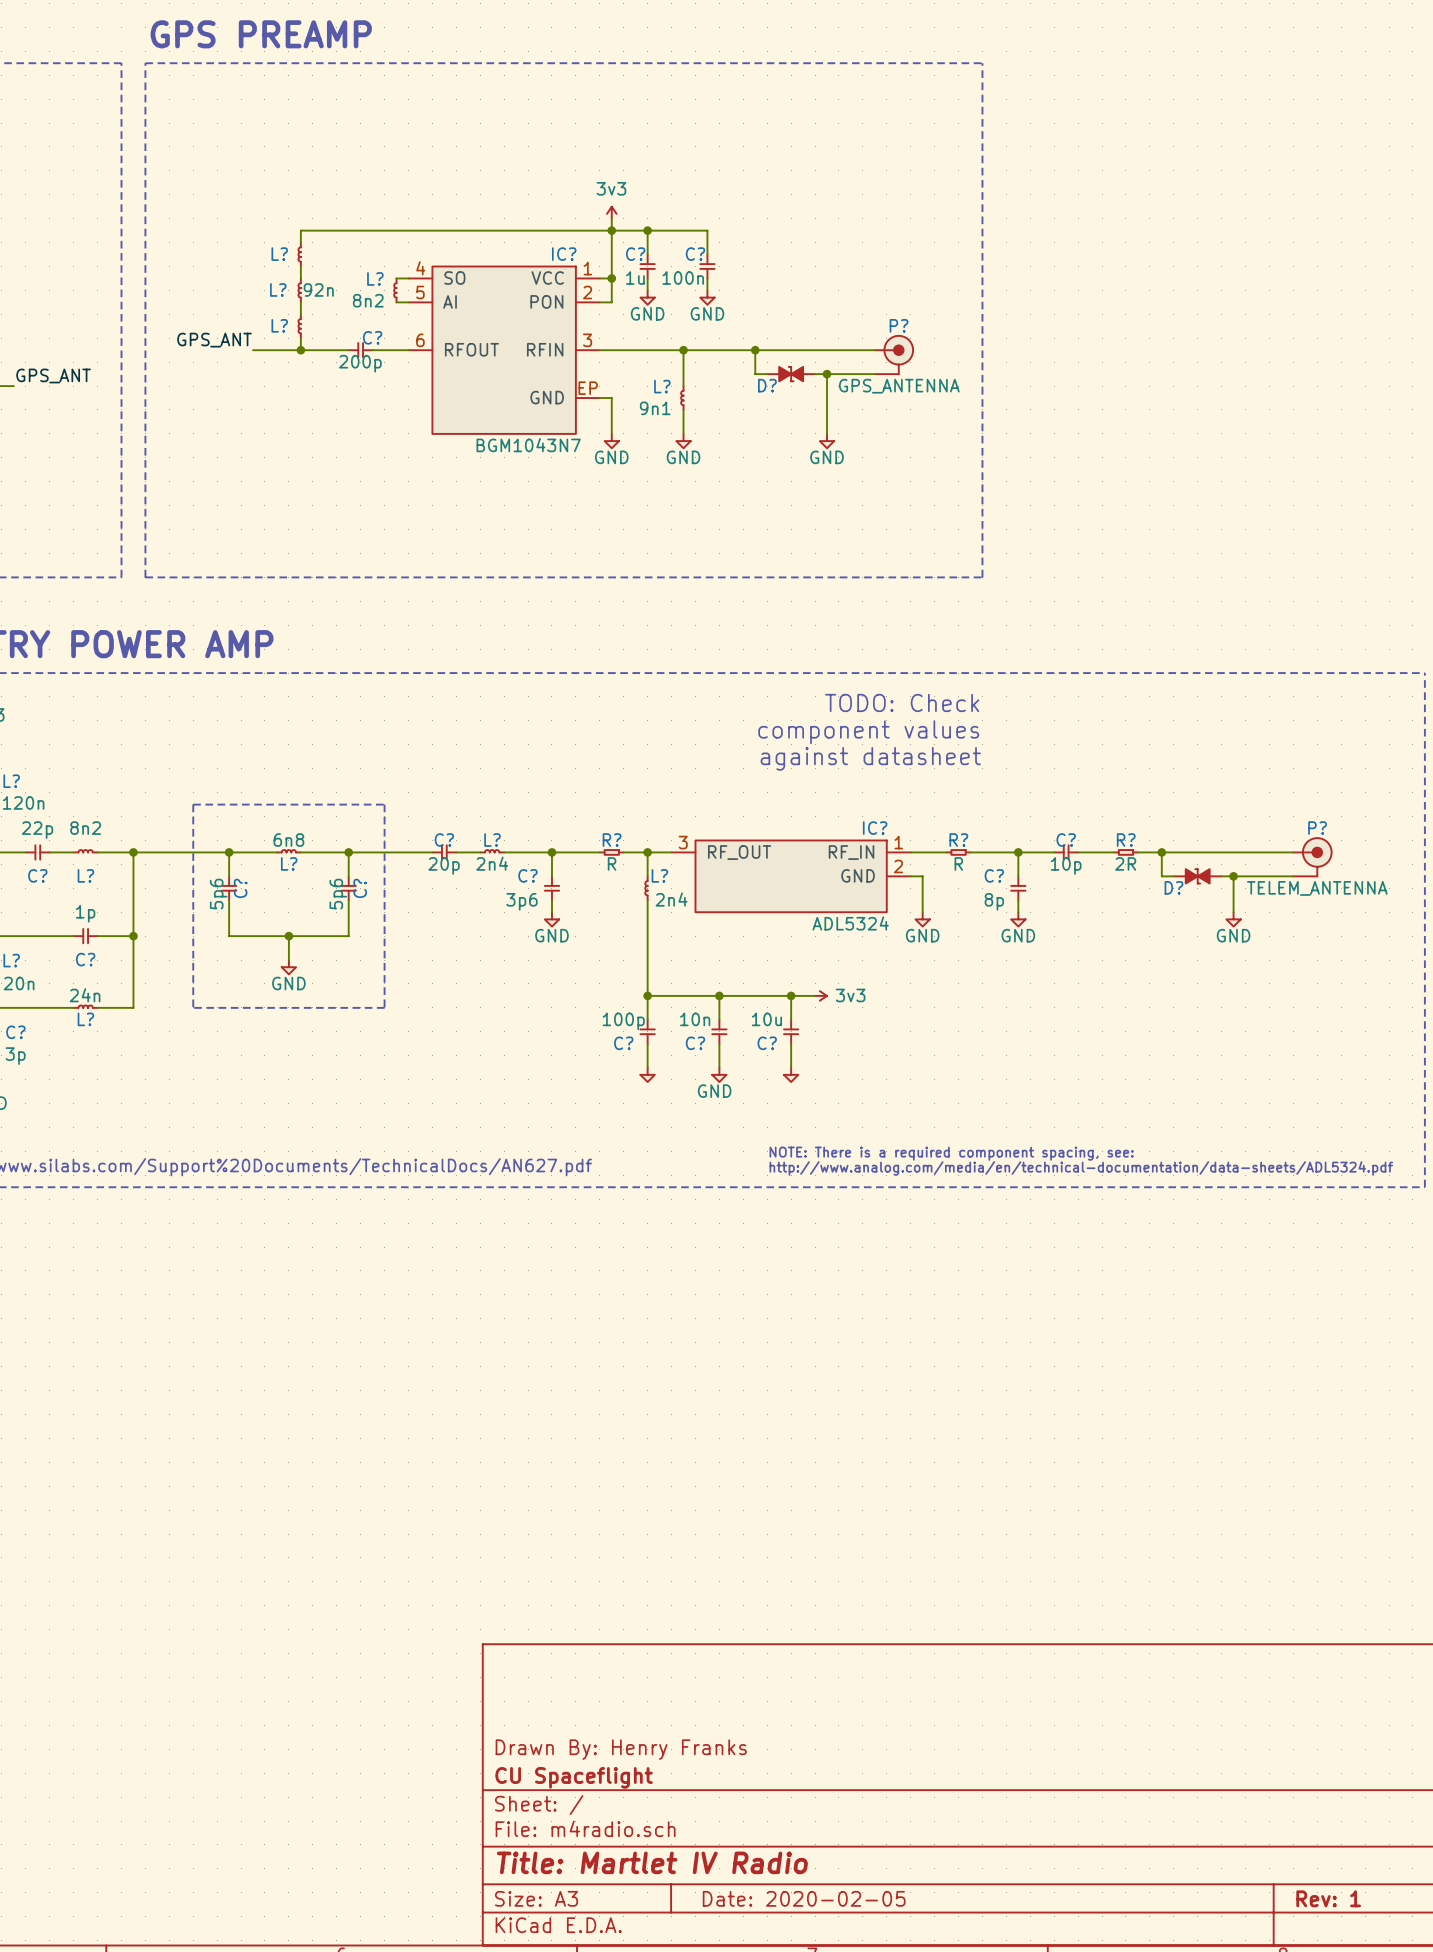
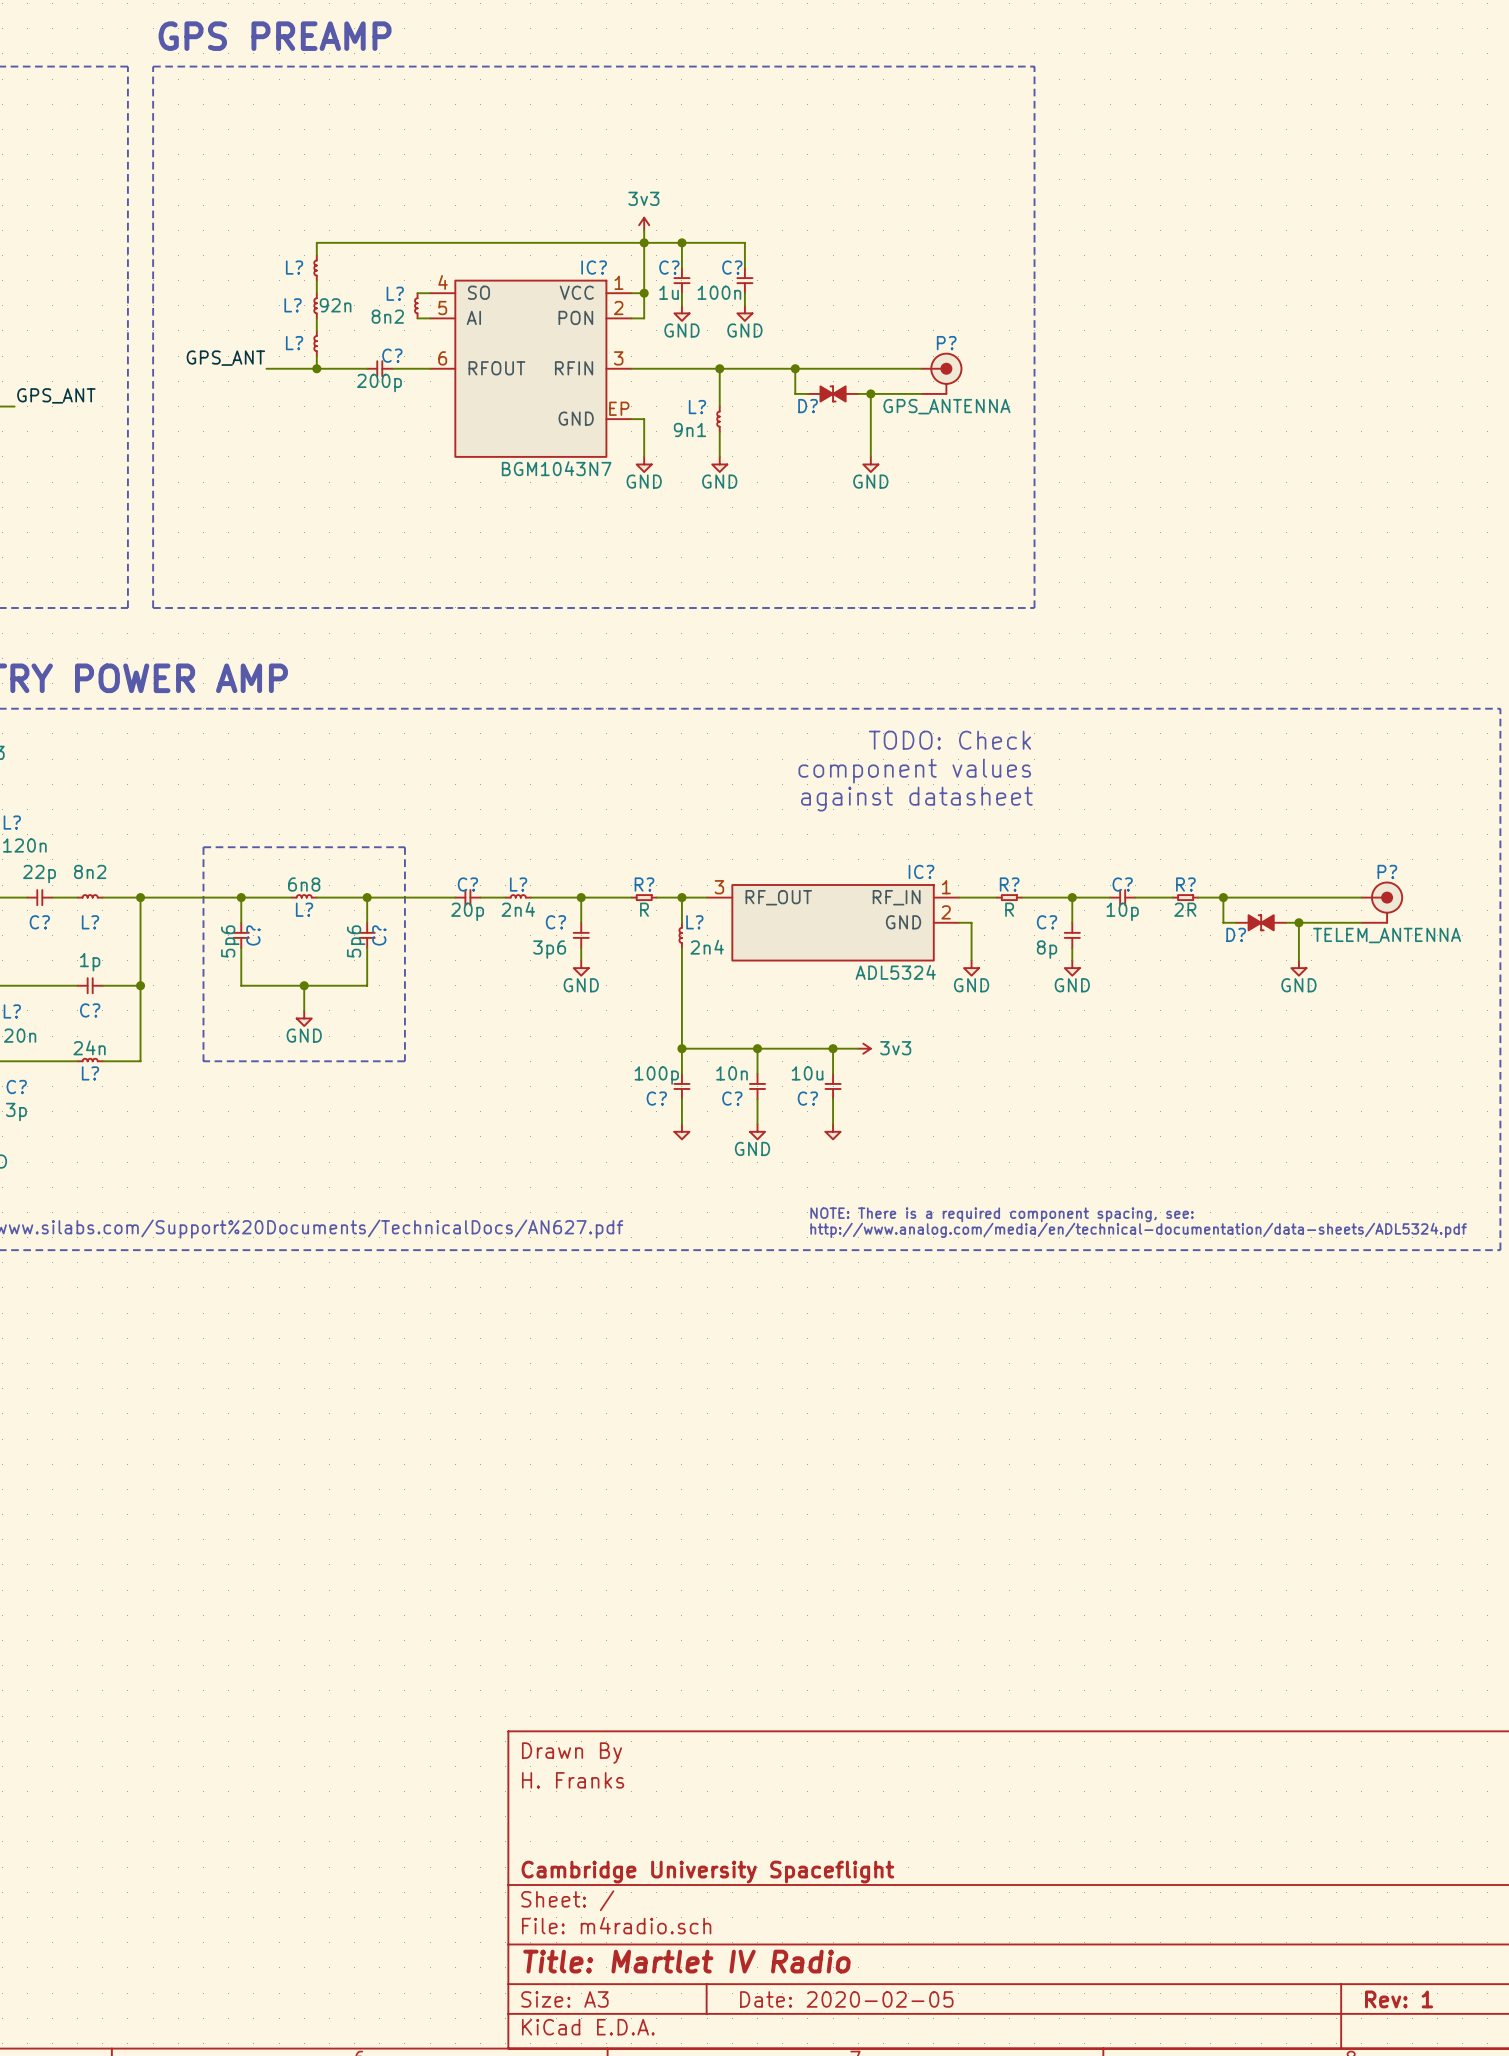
title block: none -> Drawn By (572, 1753)
title block: none -> H. Franks (573, 1780)
title block: Drawn By: Henry Franks (621, 1749) -> none
title block: CU Spaceflight (574, 1777) -> Cambridge University Spaceflight (707, 1872)

